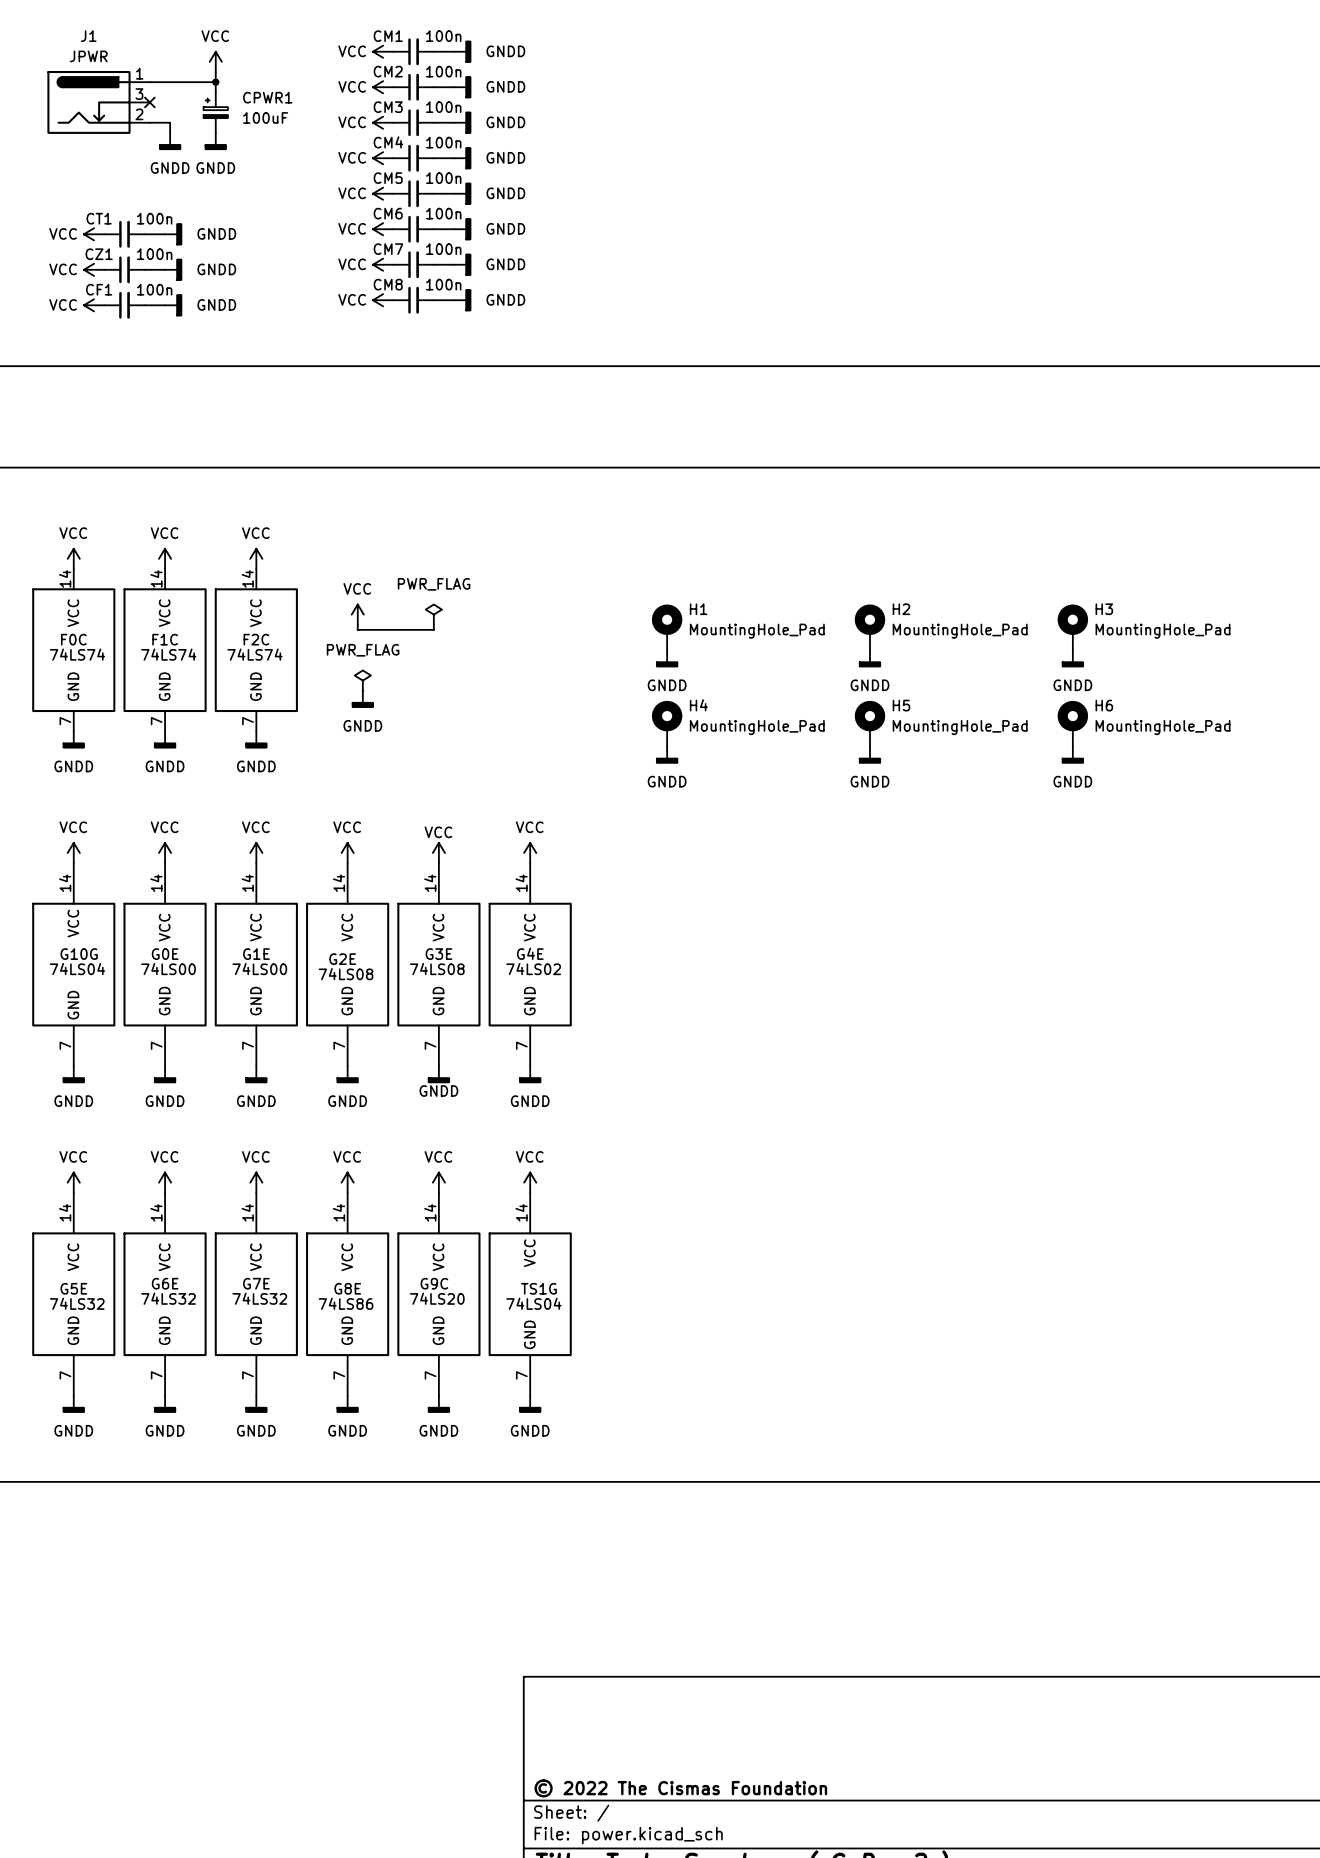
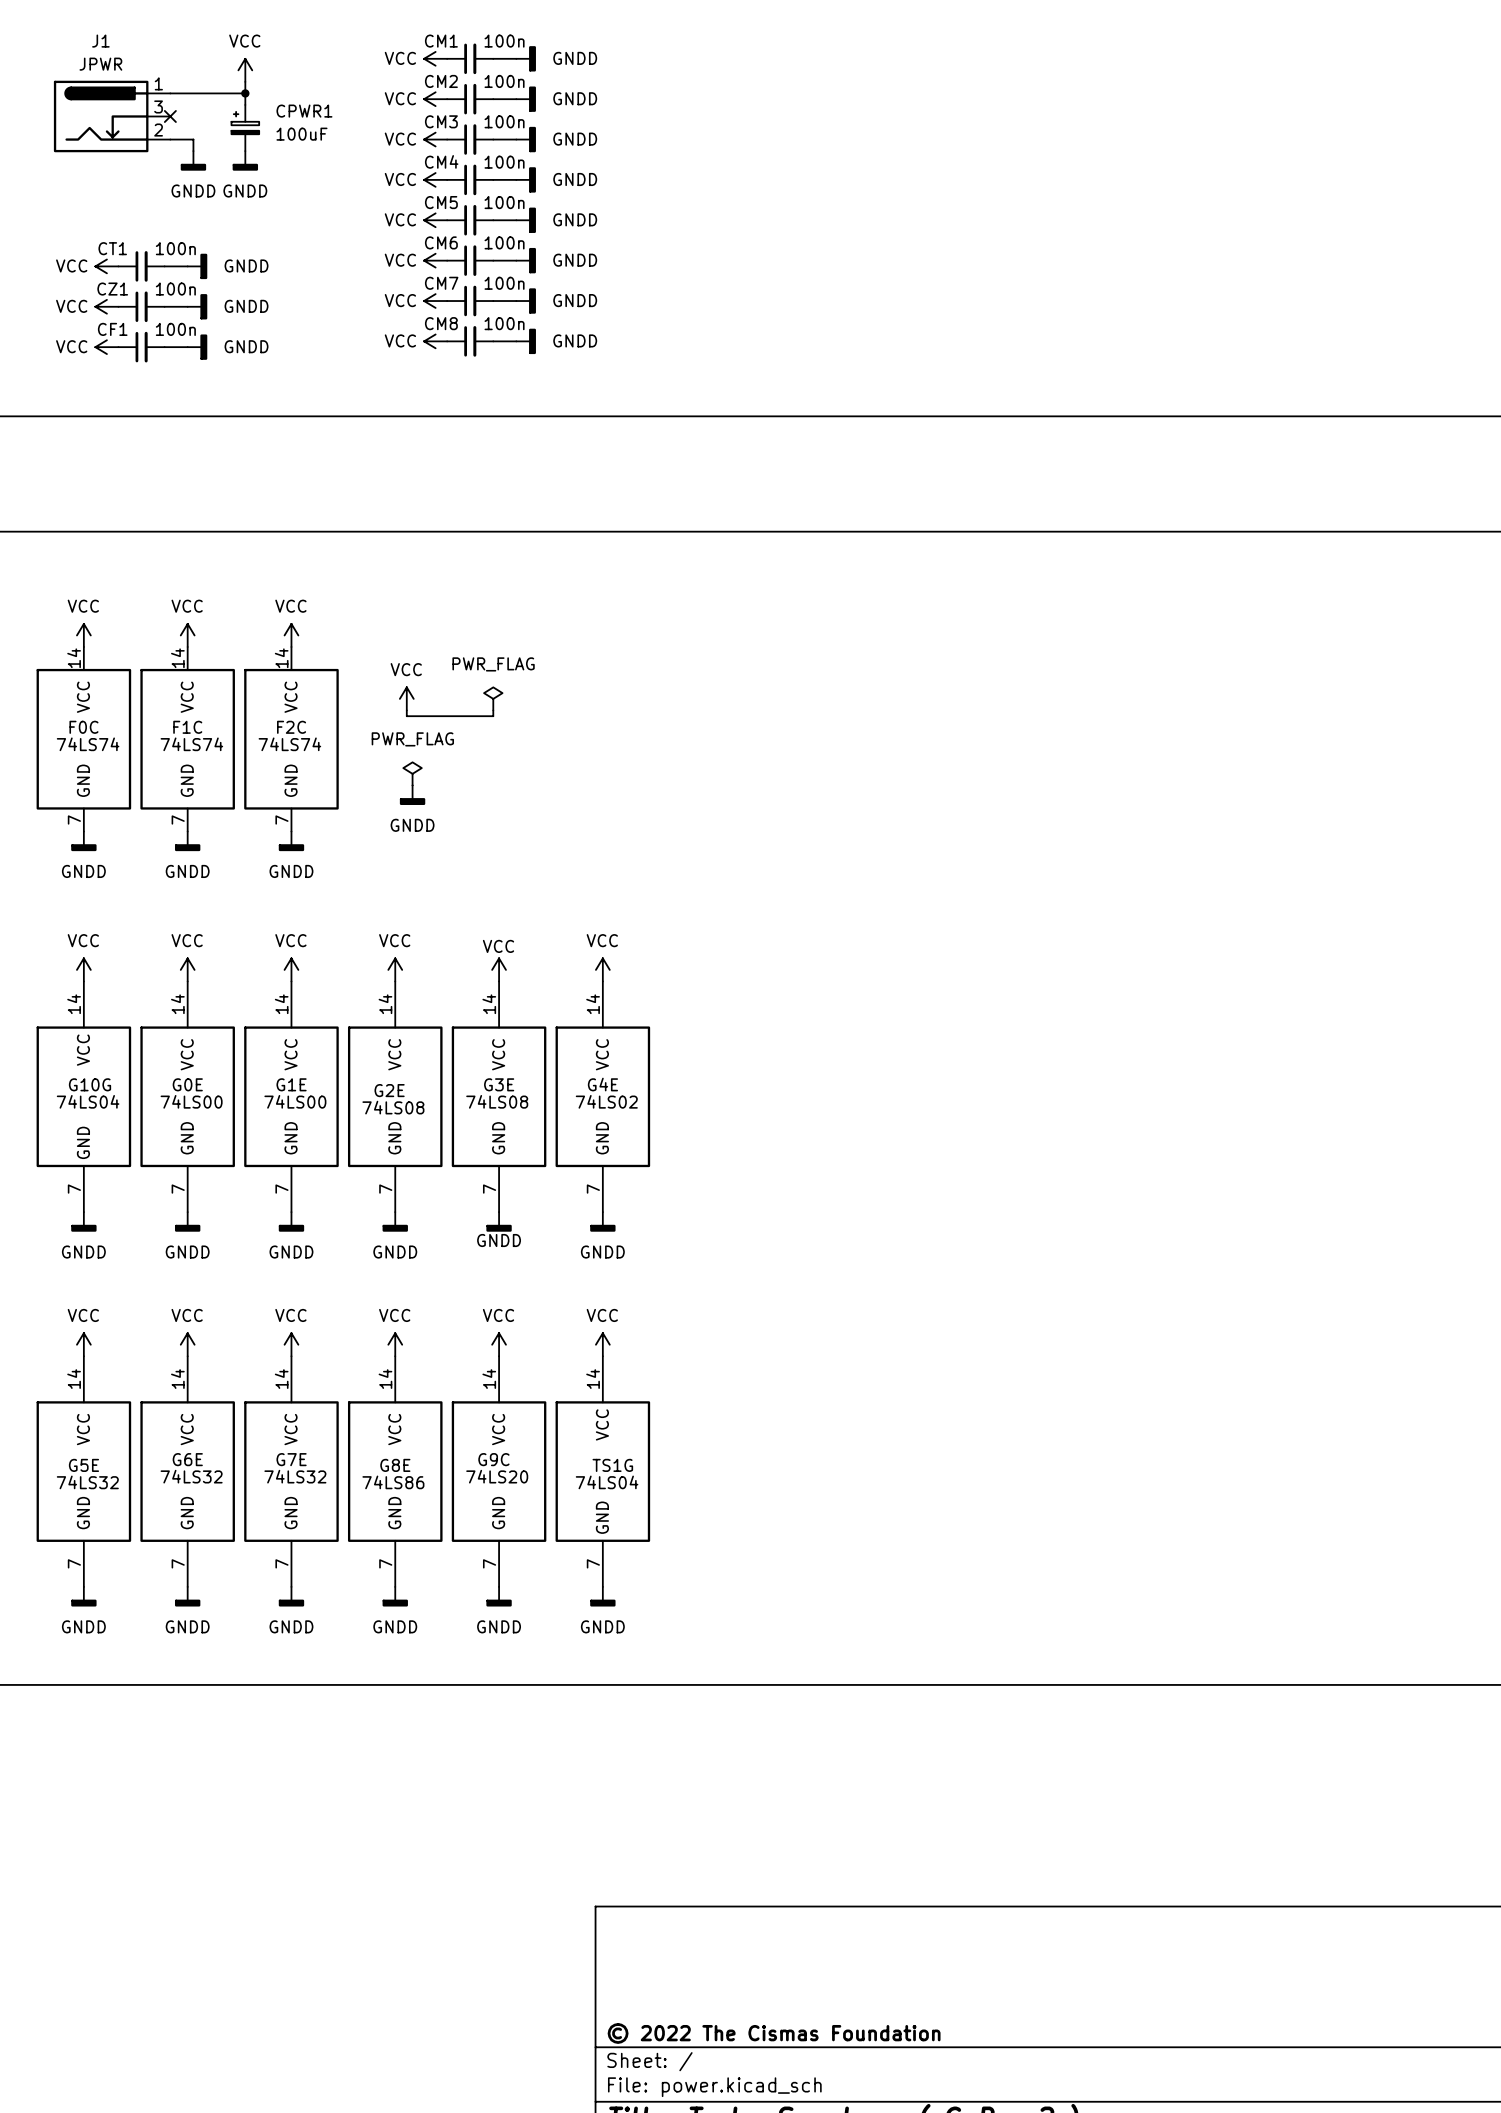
H1: MountingHole_Pad (667, 627) -> none
H2: MountingHole_Pad (869, 627) -> none
H3: MountingHole_Pad (1072, 627) -> none
power symbol: GNDD (667, 658) -> none
power symbol: GNDD (869, 658) -> none
power symbol: GNDD (1072, 658) -> none
H4: MountingHole_Pad (667, 723) -> none
H5: MountingHole_Pad (869, 723) -> none
H6: MountingHole_Pad (1072, 723) -> none
power symbol: GNDD (667, 755) -> none
power symbol: GNDD (869, 755) -> none
power symbol: GNDD (1072, 755) -> none

